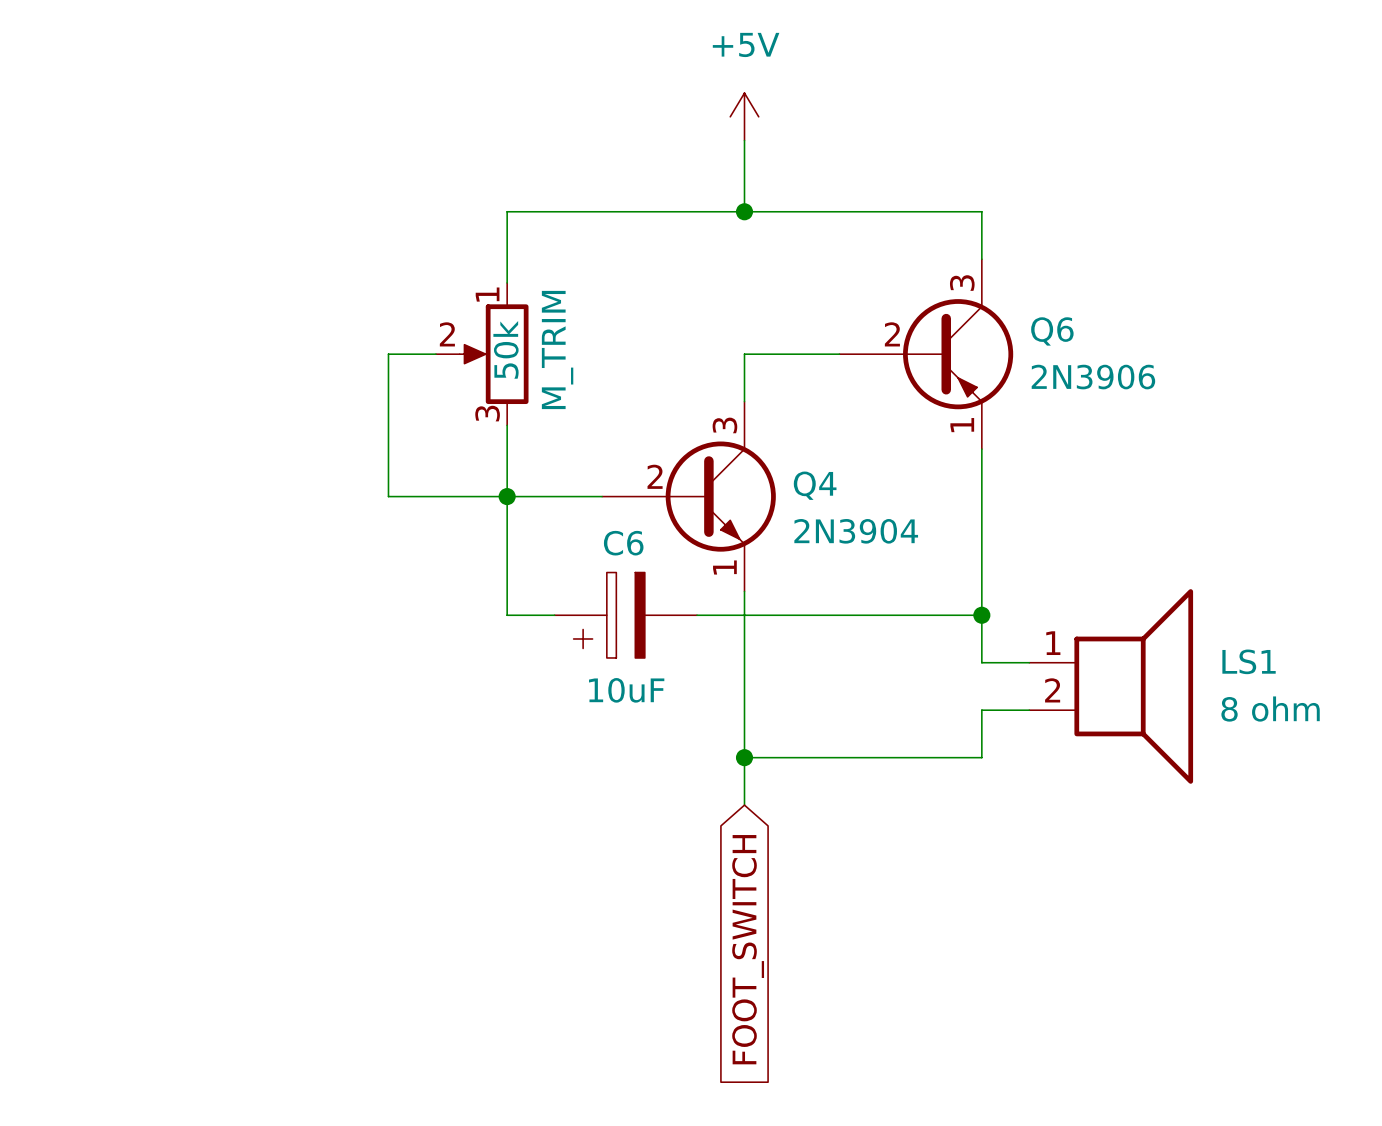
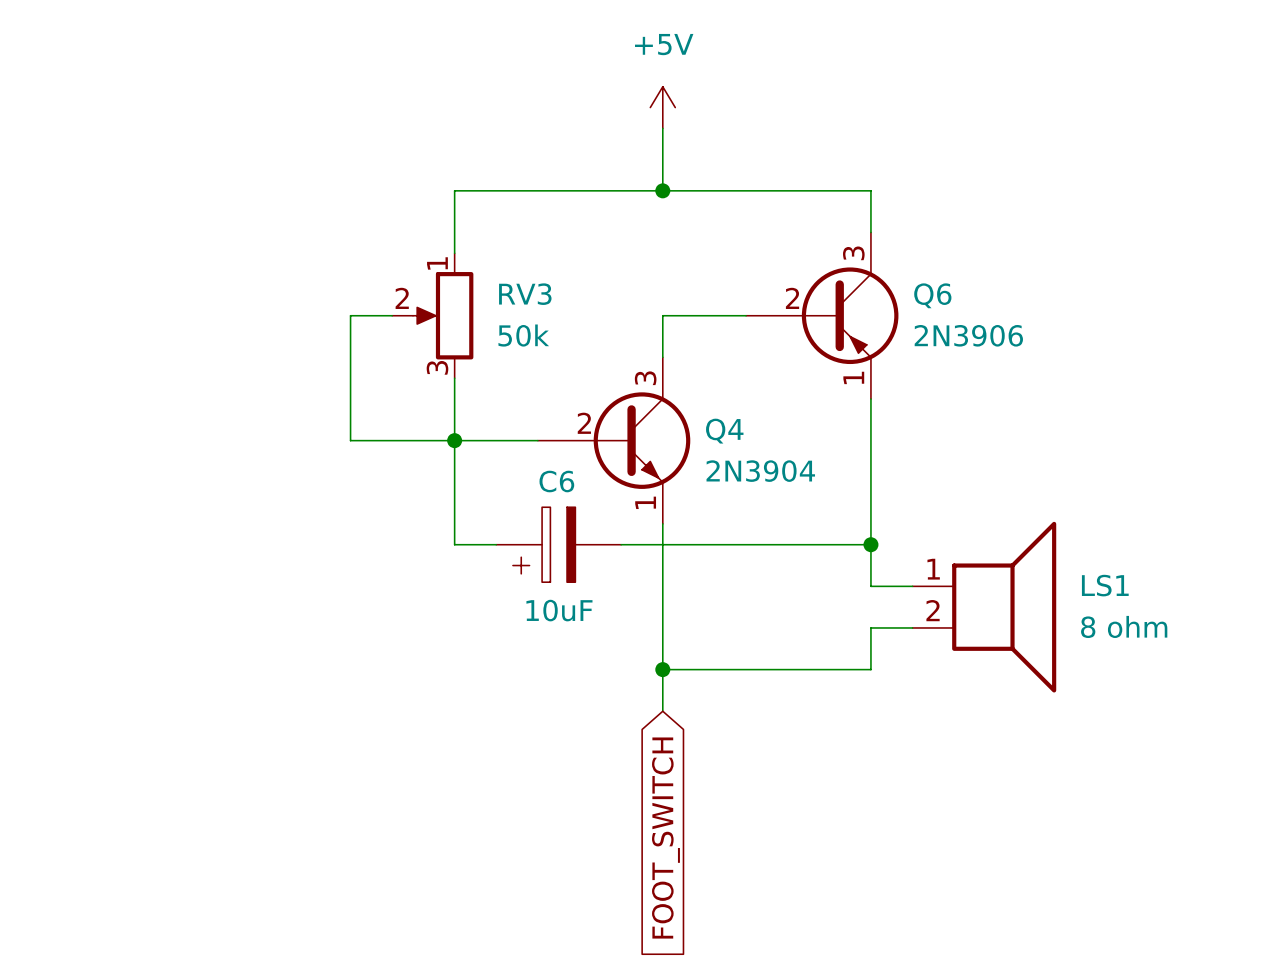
M_TRIM value rotation: 0° (506, 349) -> 90° clockwise (523, 335)
M_TRIM value position: 50k (506, 349) -> 50k (523, 335)
M_TRIM name: M_TRIM (557, 349) -> RV3 (525, 294)

